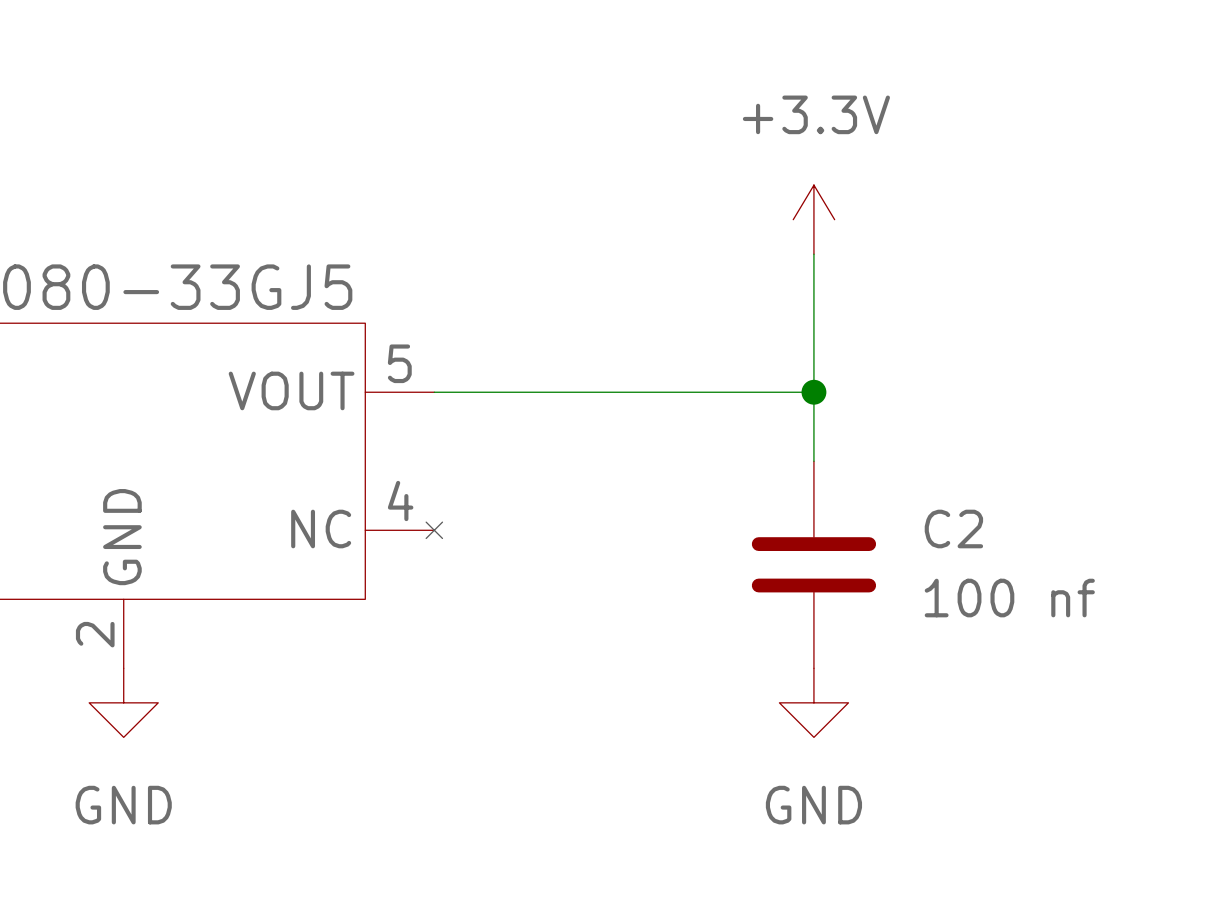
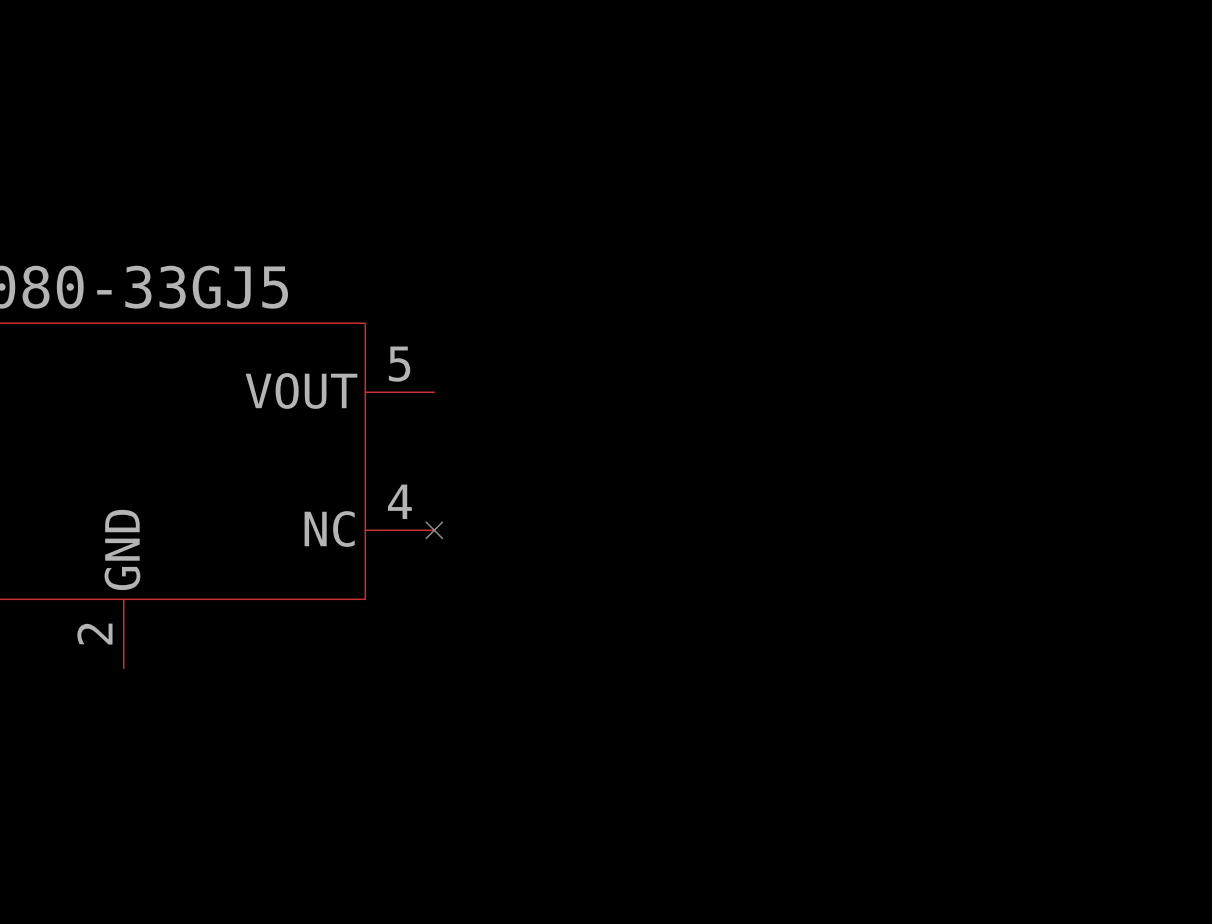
power symbol: +3.3V (813, 219) -> none
wire: (813, 254) (813, 461) -> none
wire: (434, 392) (813, 392) -> none
junction: (813, 392) -> none
C2: 100 nf (813, 564) -> none
power symbol: GND (123, 702) -> none
power symbol: GND (813, 702) -> none

